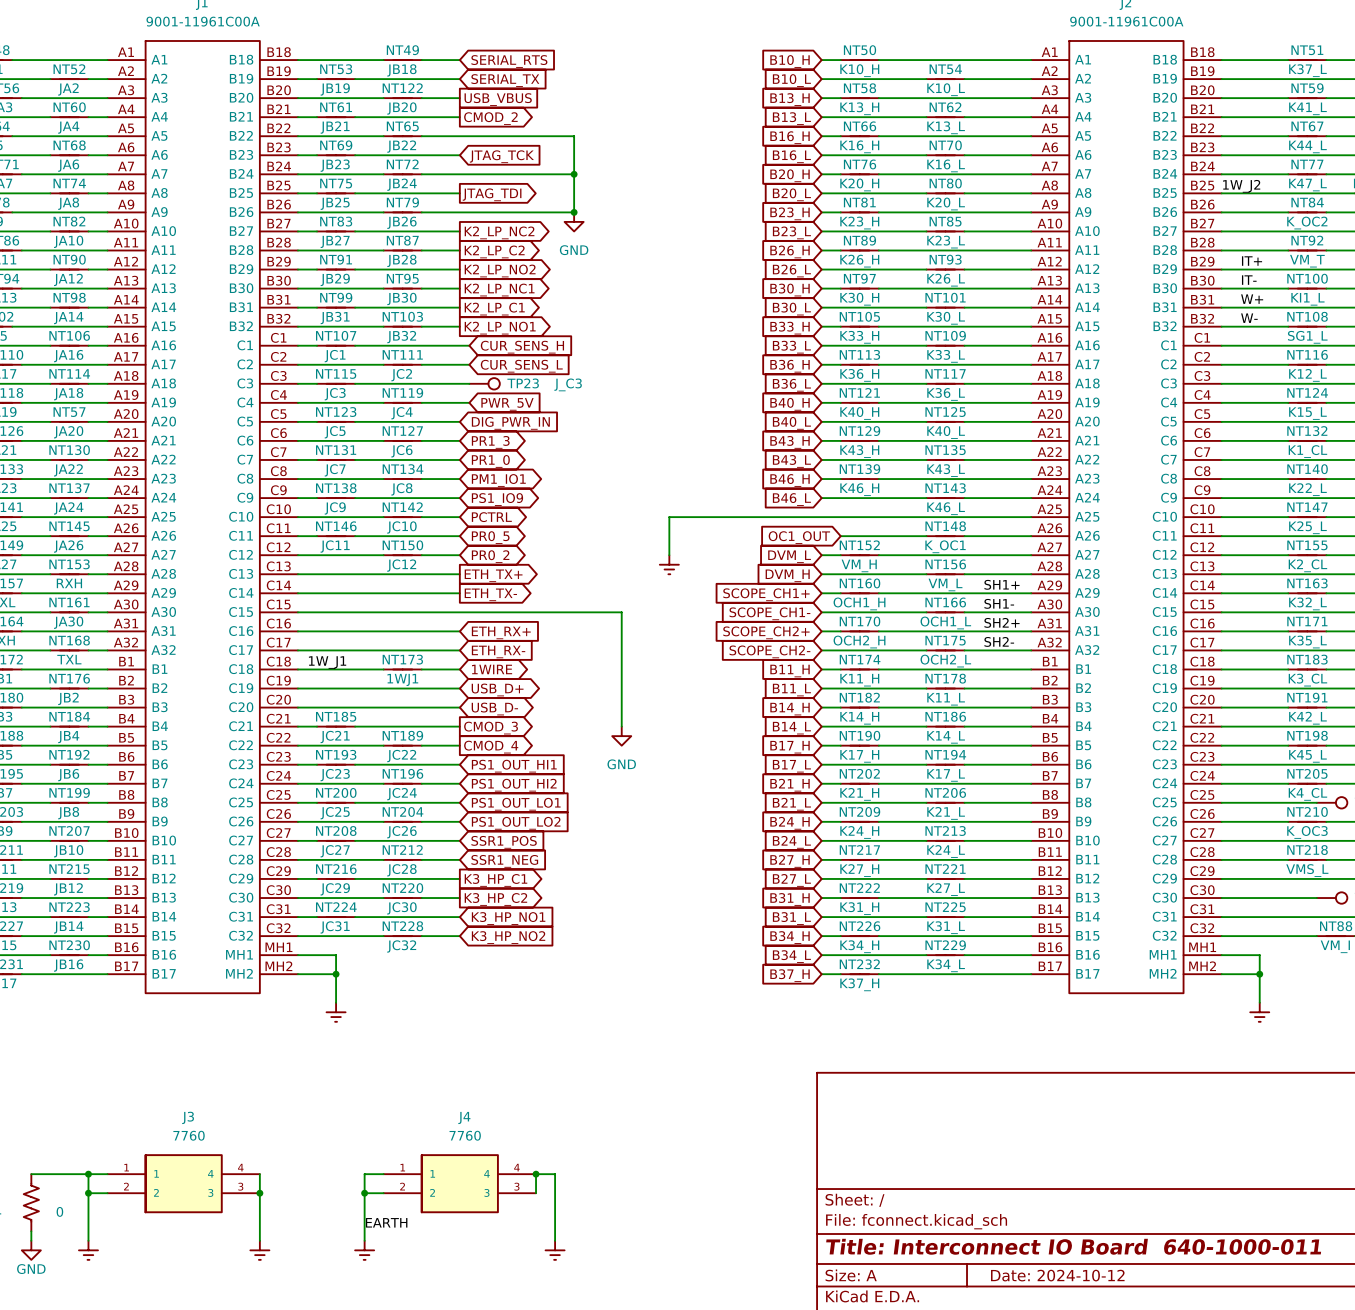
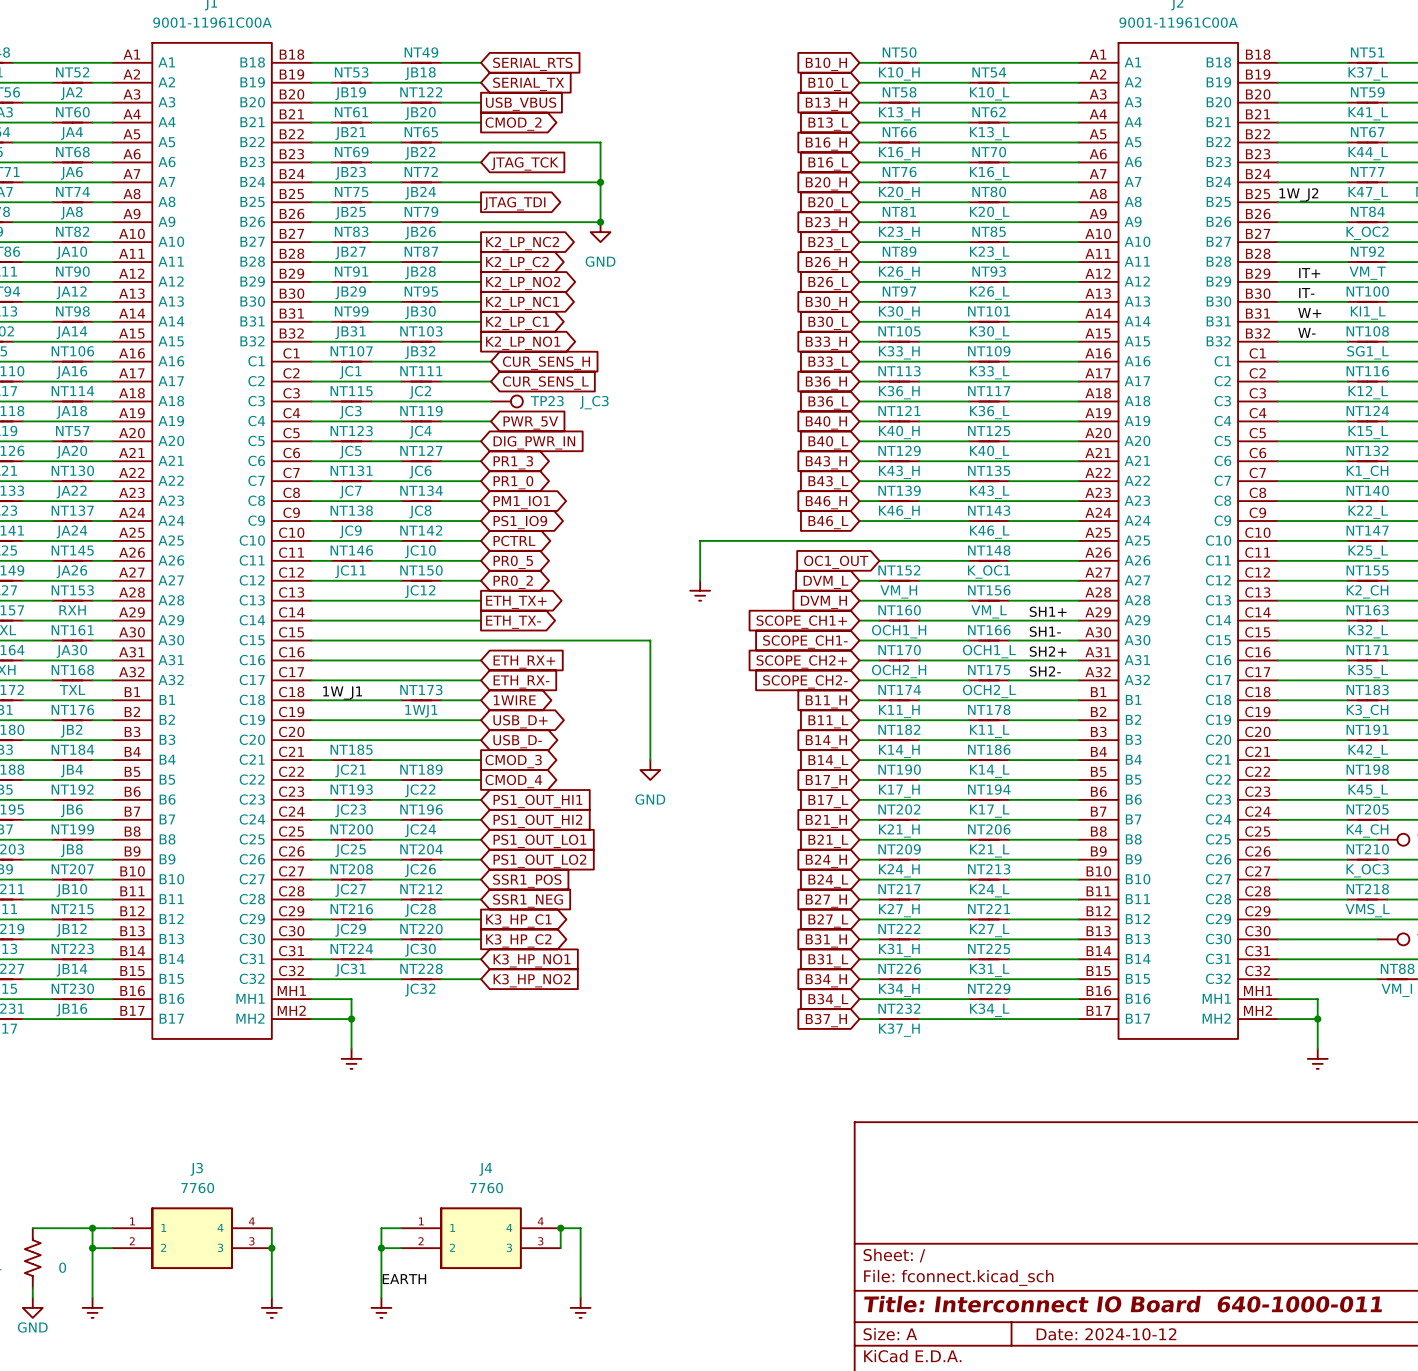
NT132 value: K1_CL (1307, 451) -> K1_CH (1367, 472)
NT155 value: K2_CL (1307, 565) -> K2_CH (1367, 591)
NT183 value: K3_CL (1307, 680) -> K3_CH (1367, 711)
NT205 value: K4_CL (1307, 794) -> K4_CH (1367, 830)

